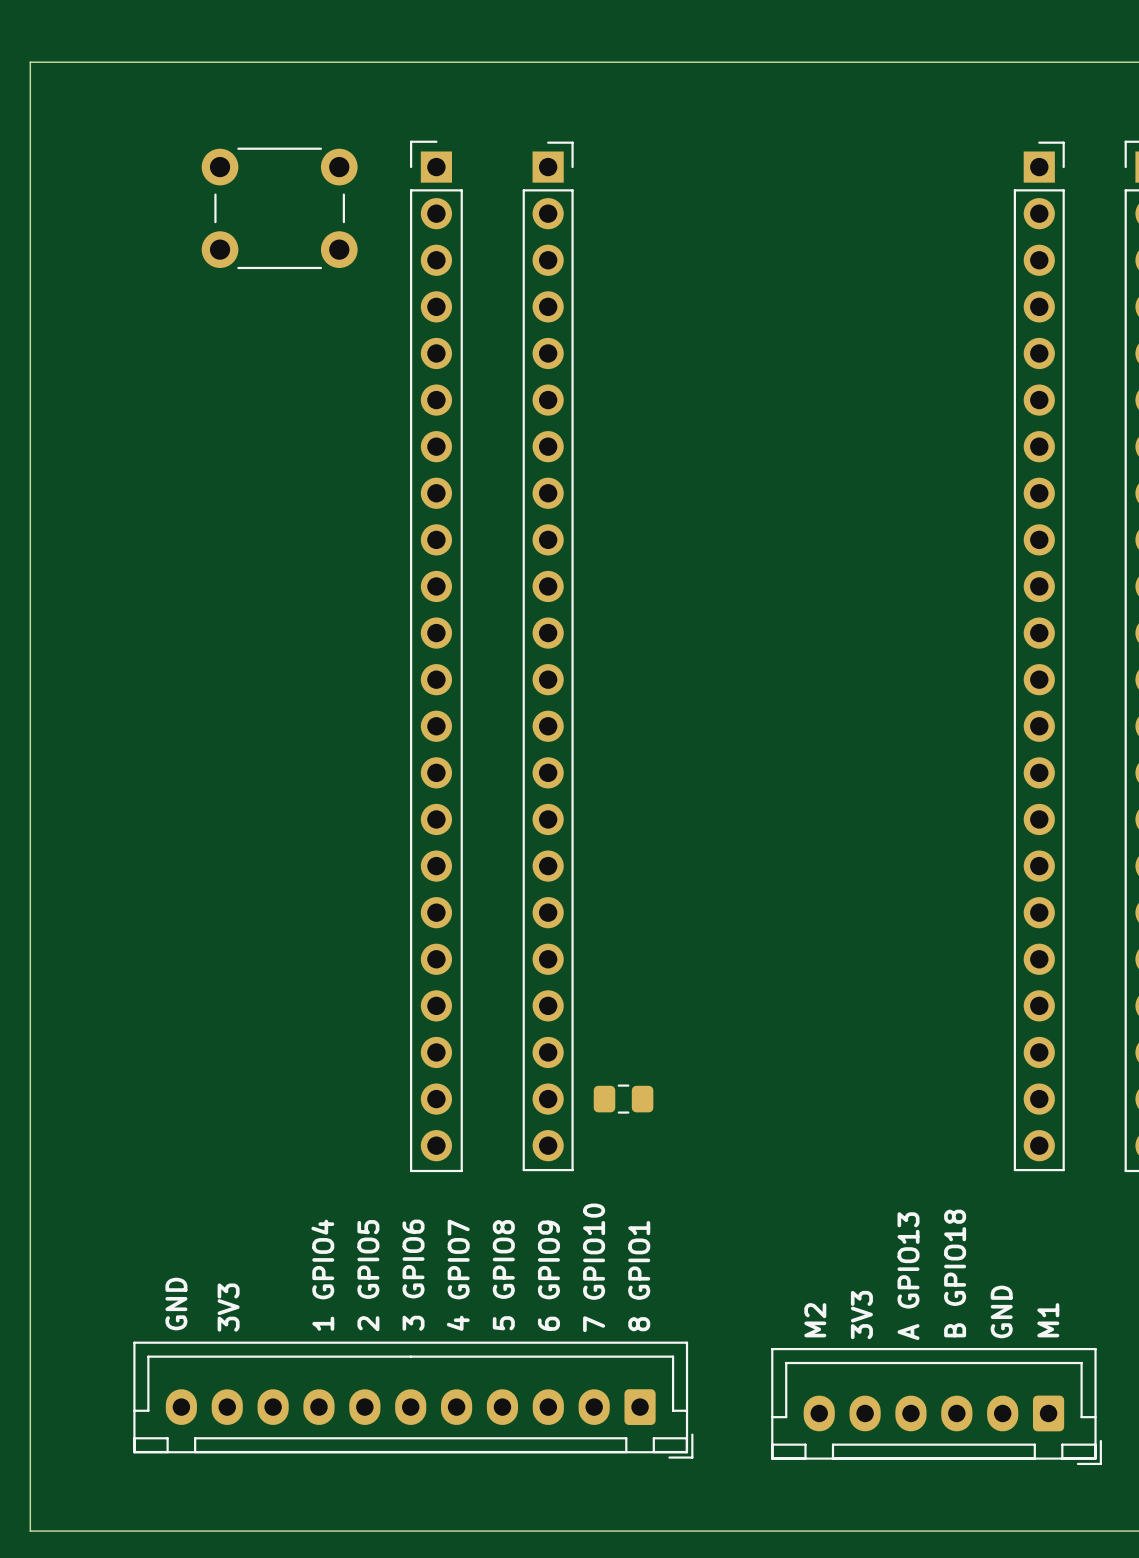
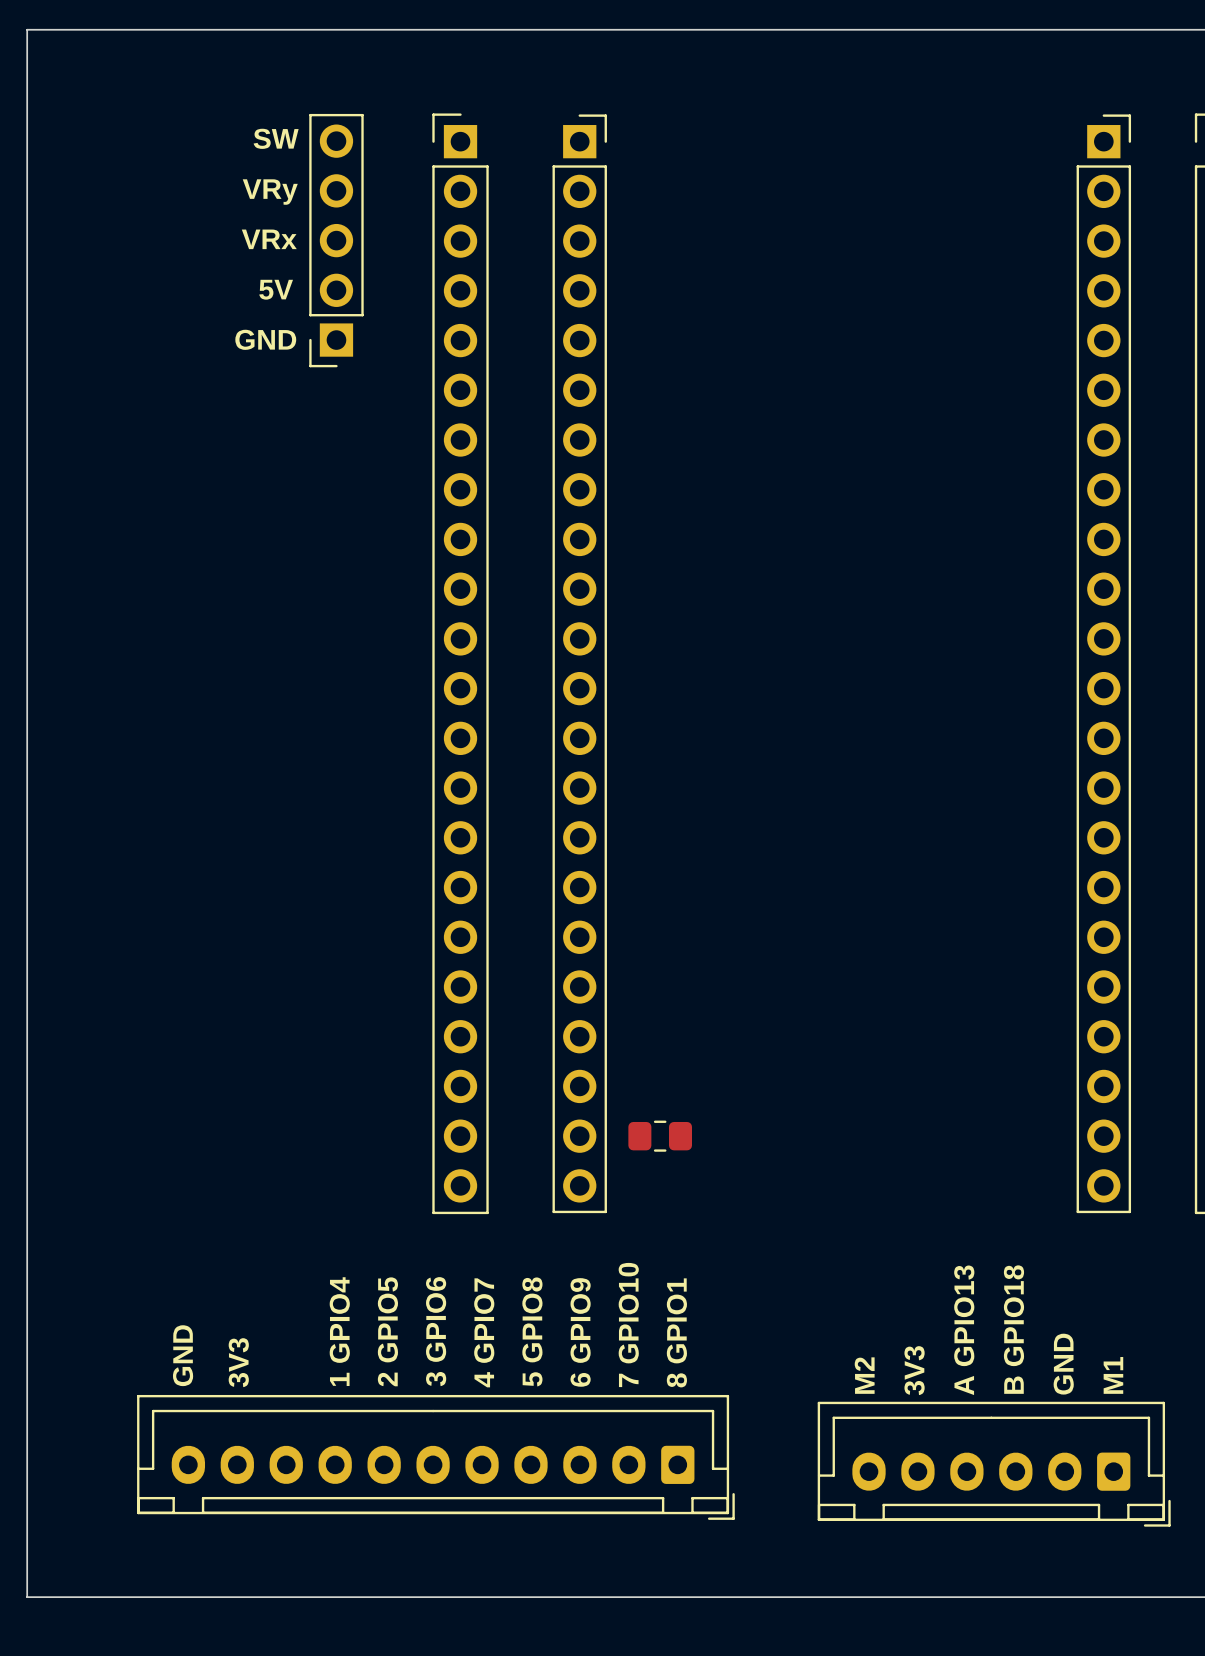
text: none -> SW (276, 138)
part: (279, 208) -> none
text: none -> VRy (270, 192)
text: none -> VRx (269, 239)
part: none -> (336, 240)
text: none -> 5V (276, 289)
text: none -> GND (265, 339)

